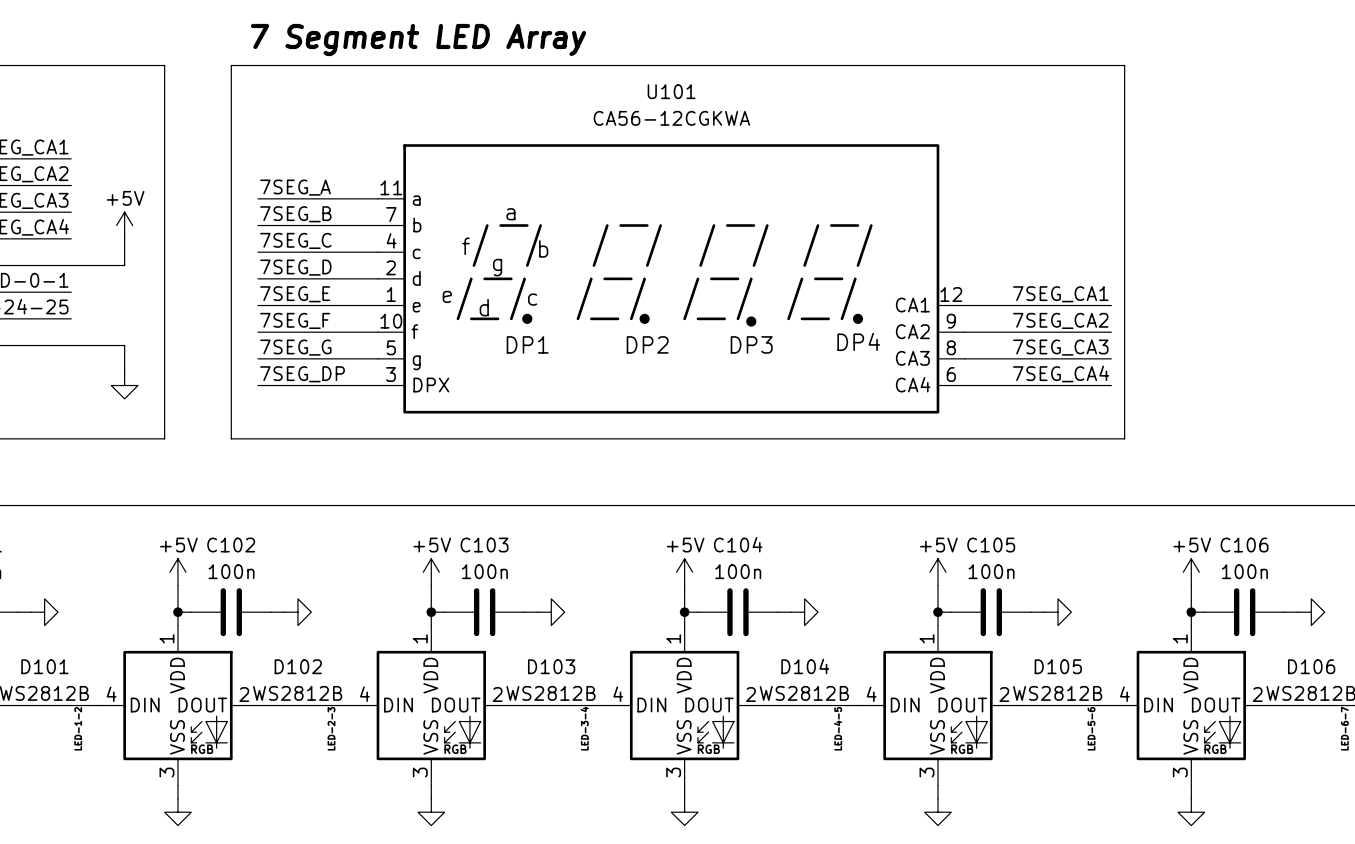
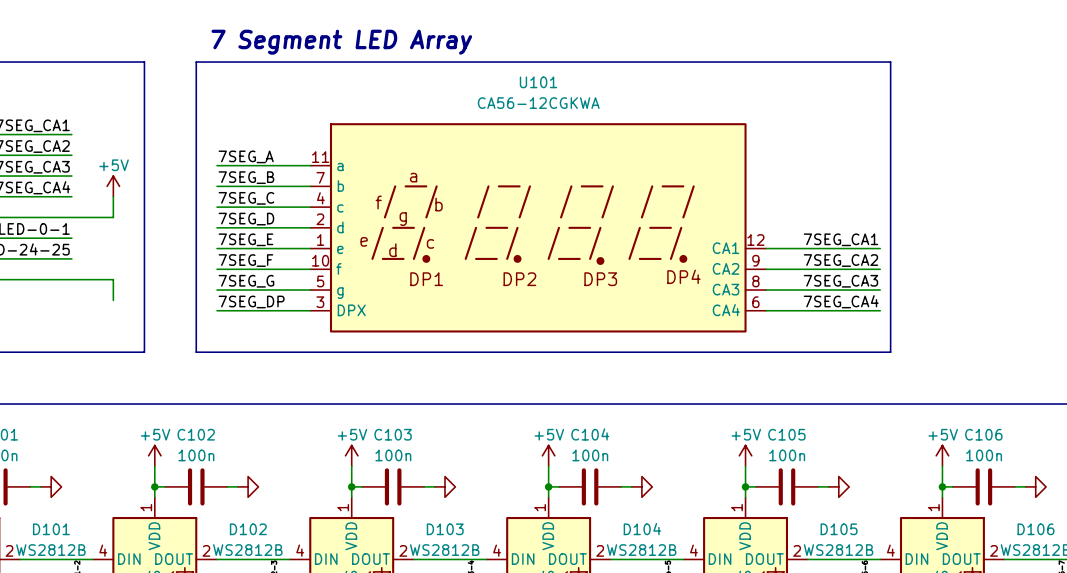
power symbol: (124, 385) -> none

